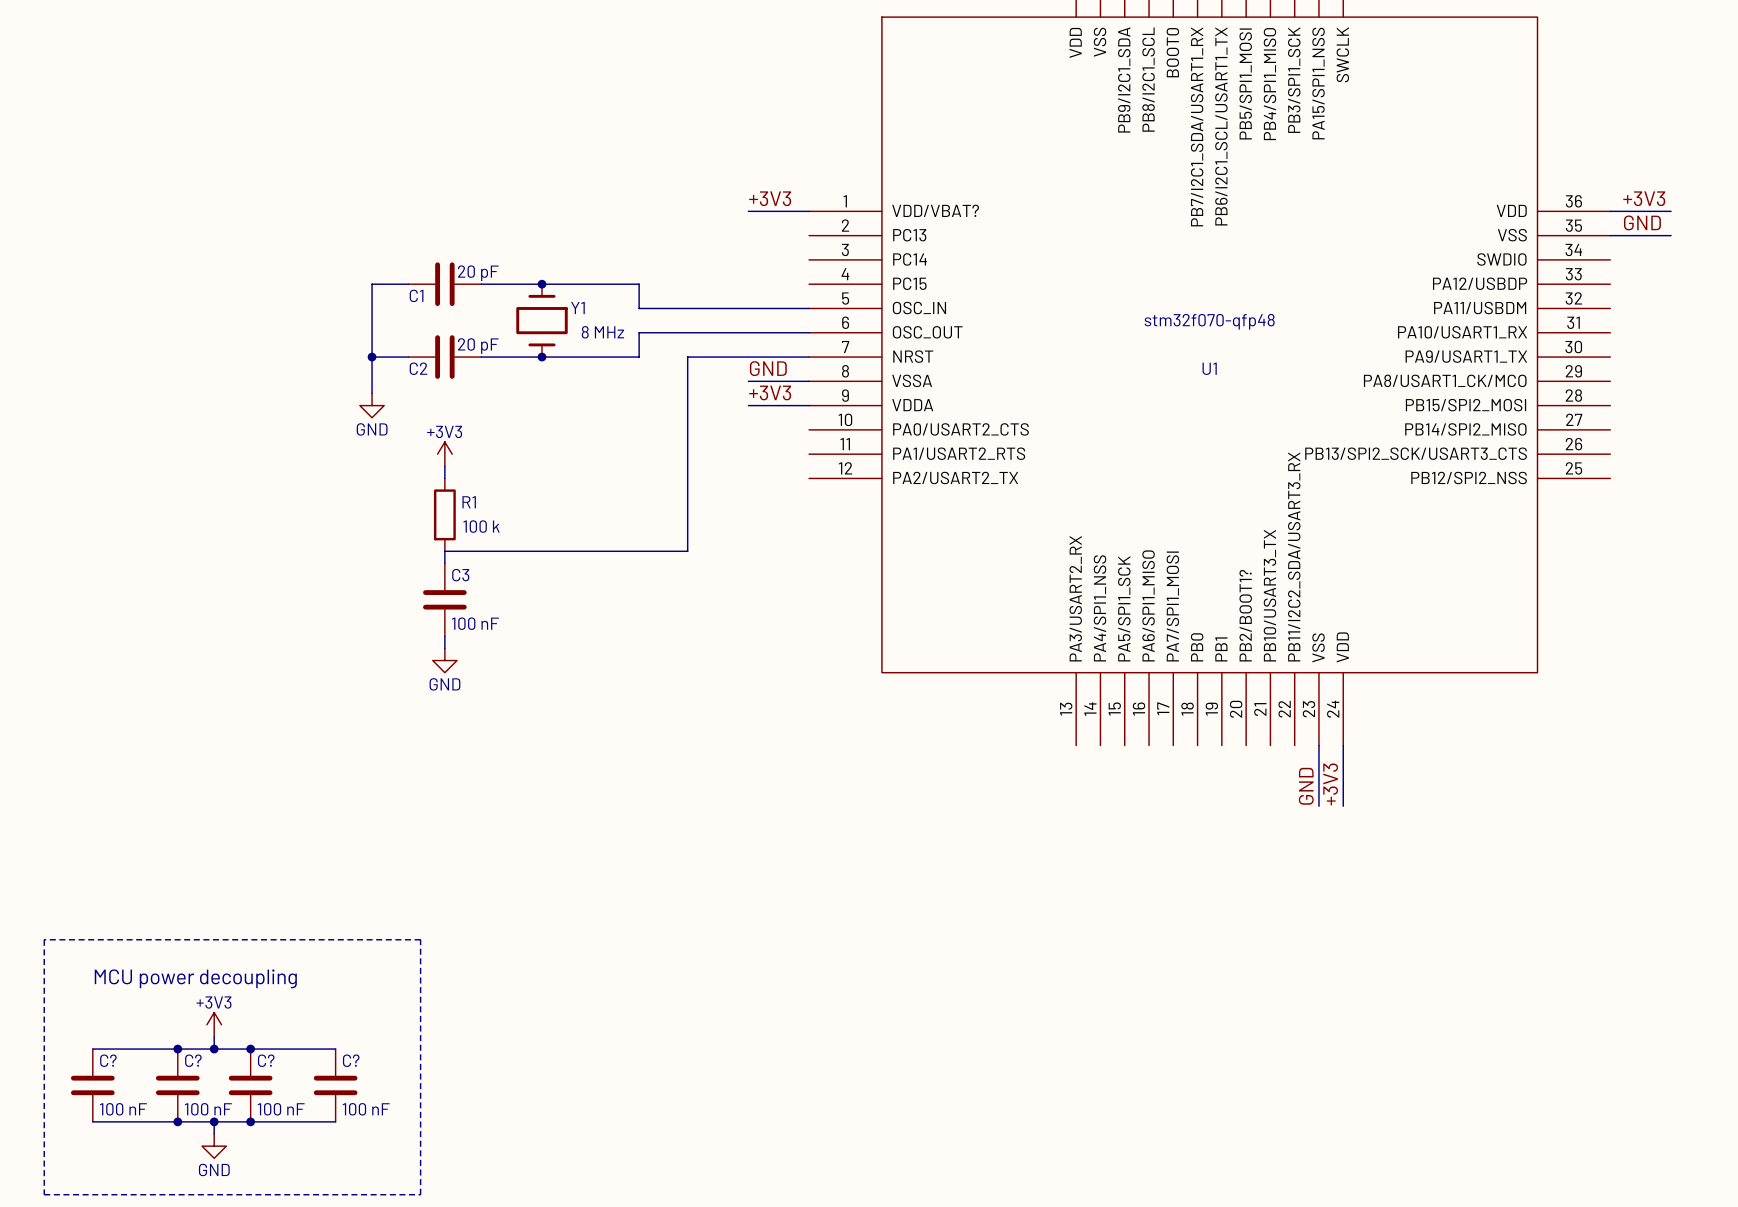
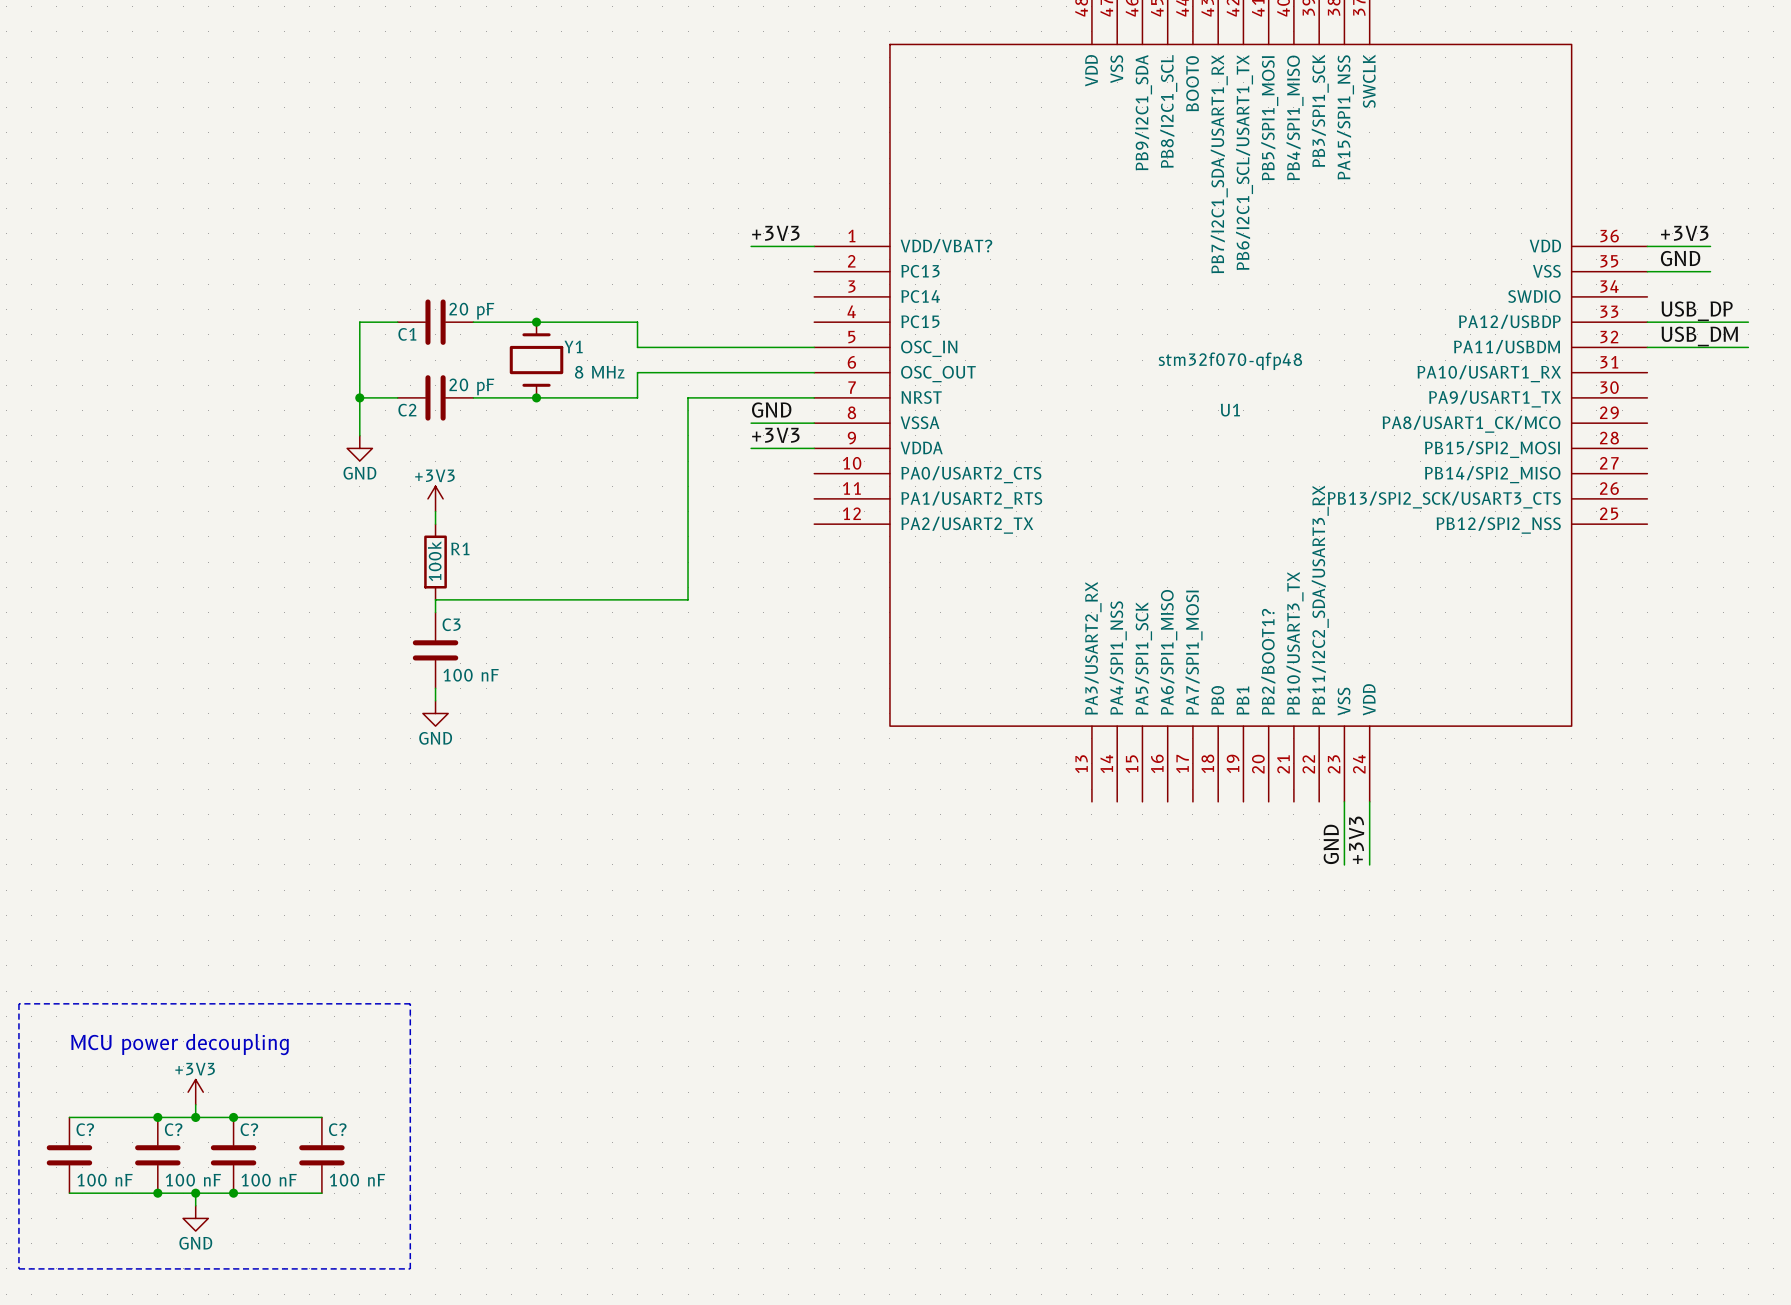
label: none -> USB_DP (1697, 311)
wire: none -> (1647, 322) (1748, 322)
label: none -> USB_DM (1699, 336)
wire: none -> (1647, 347) (1748, 347)
R1 value: 100 k (481, 526) -> 100k (434, 561)

